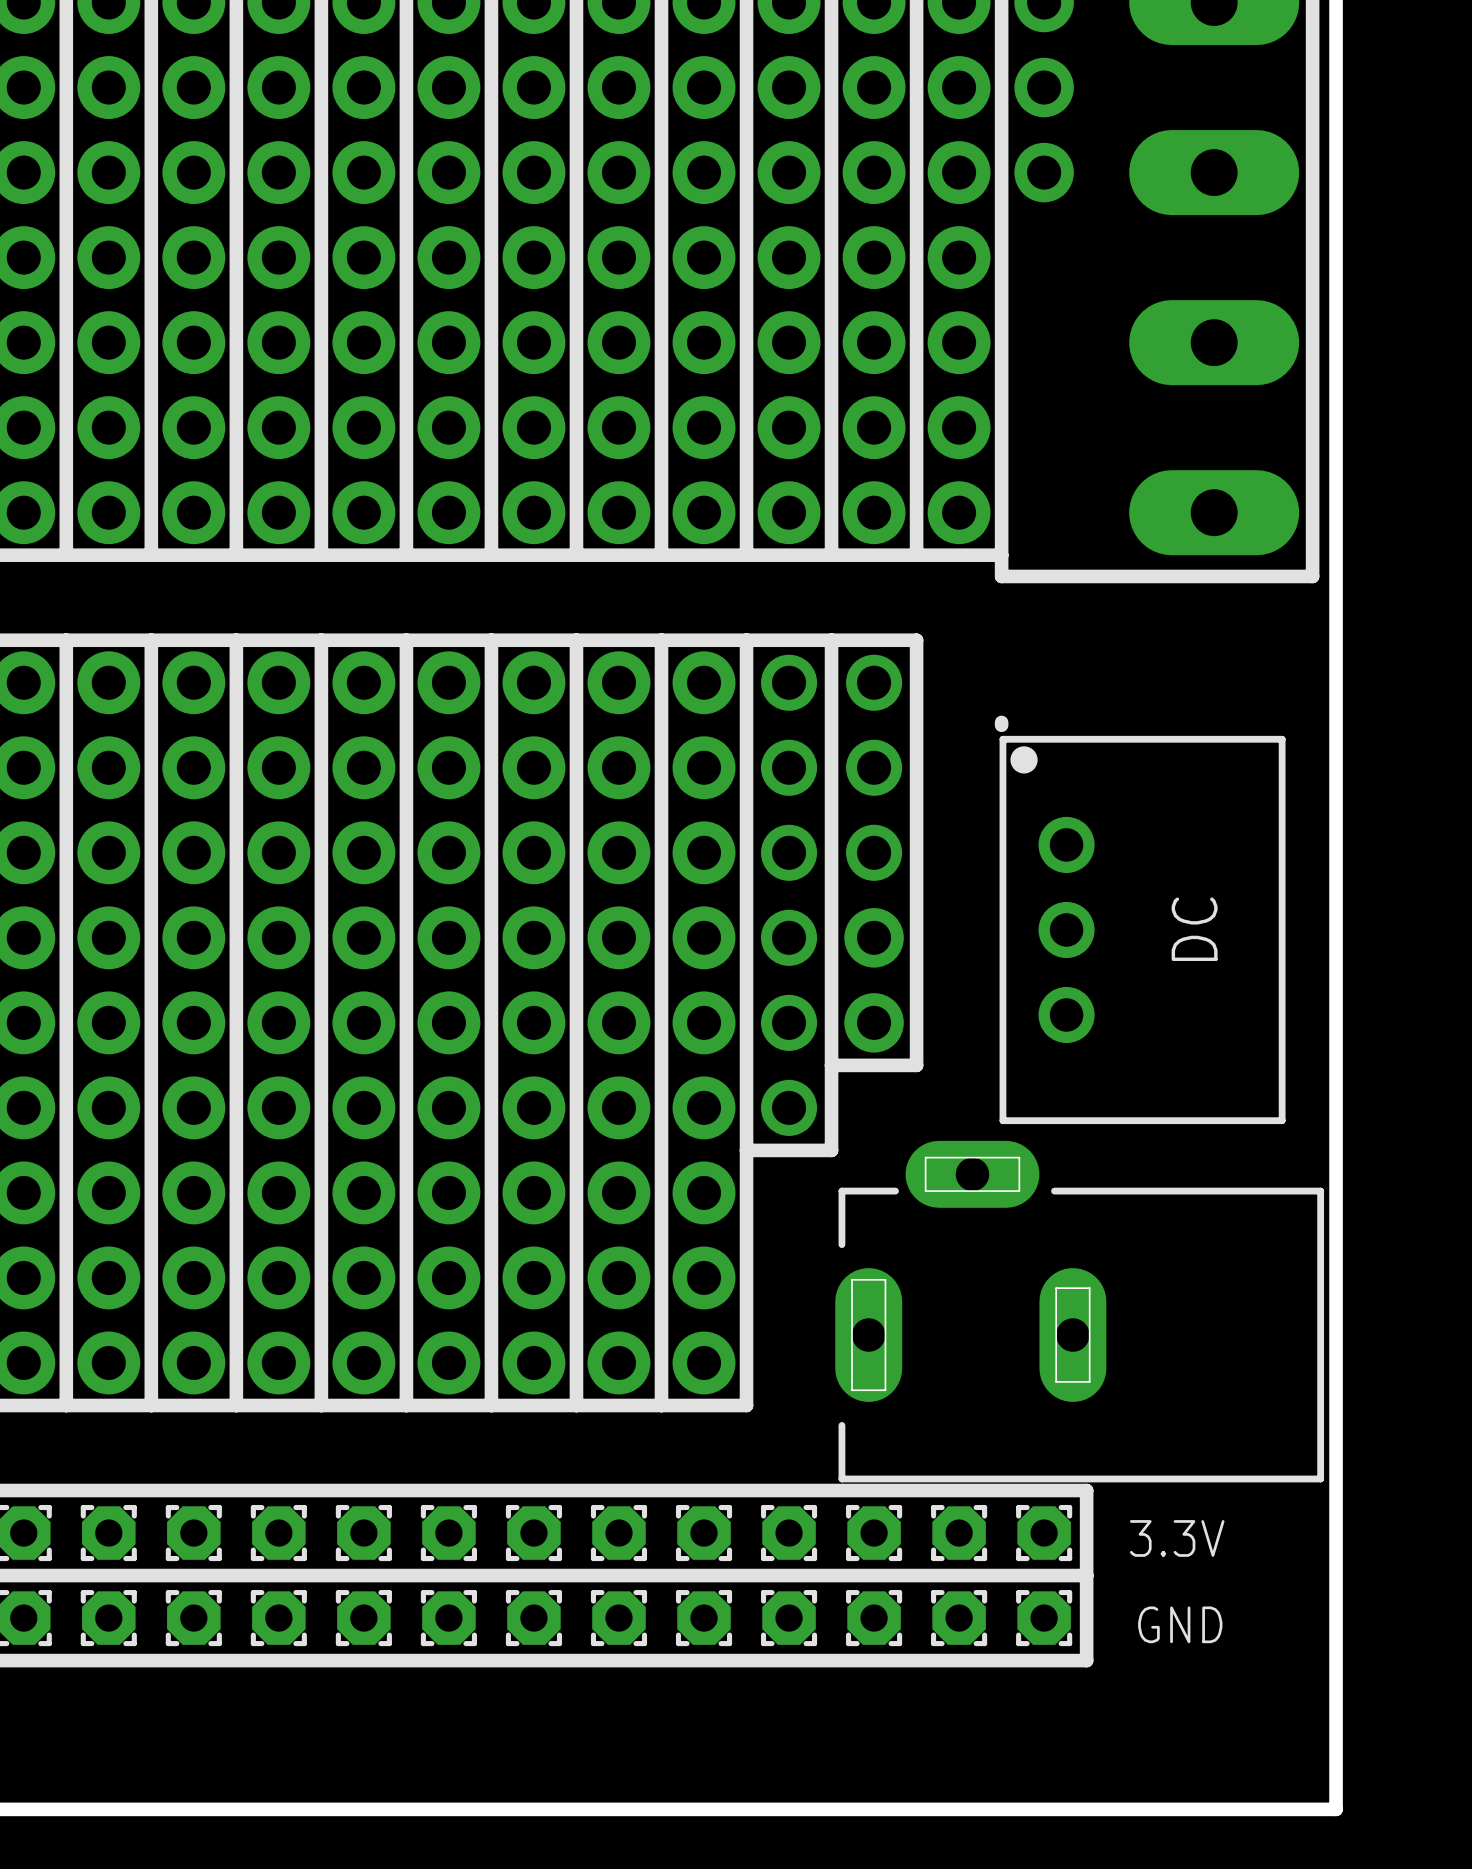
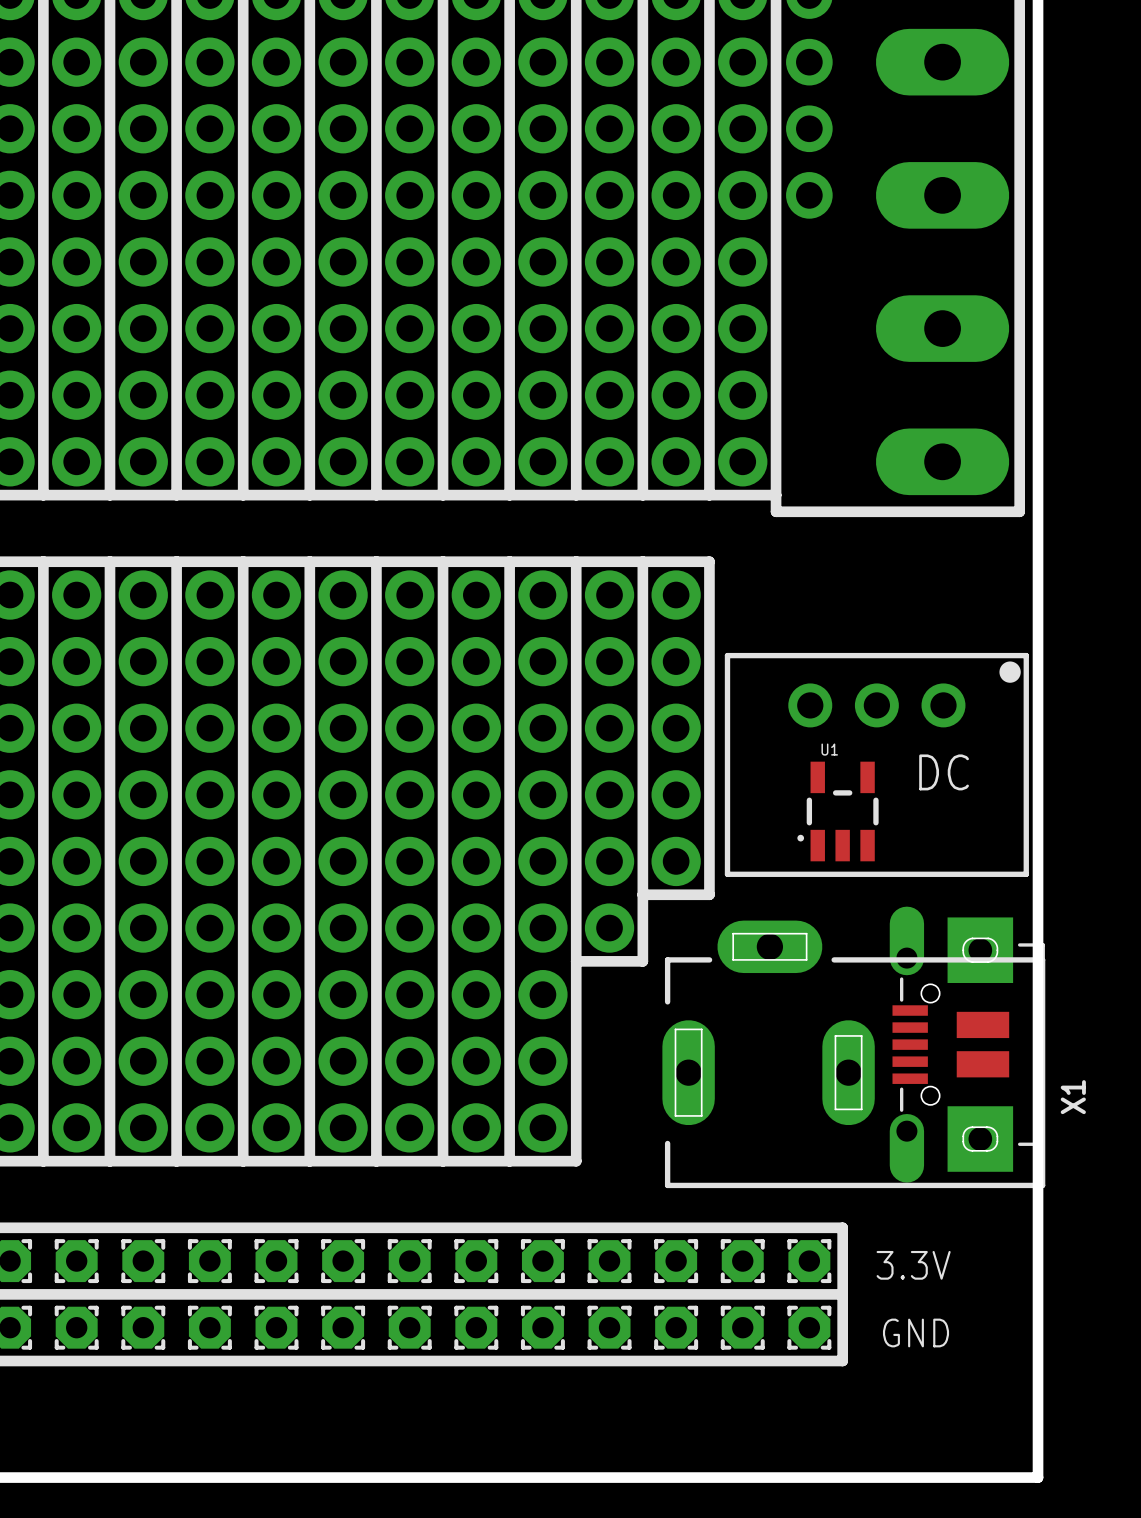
line: (1001, 722) (1001, 725) -> none
part: (789, 767) -> none
part: (874, 767) -> none
part: none -> (676, 728)
part: none -> (609, 761)
DC rotation: 0° (1142, 929) -> 90° clockwise (876, 764)
part: (874, 937) -> none
U1: none -> (838, 811)
part: (789, 1022) -> none
part: (874, 1022) -> none
X1: none -> (967, 1044)
part position: (1079, 1311) -> (853, 1054)

